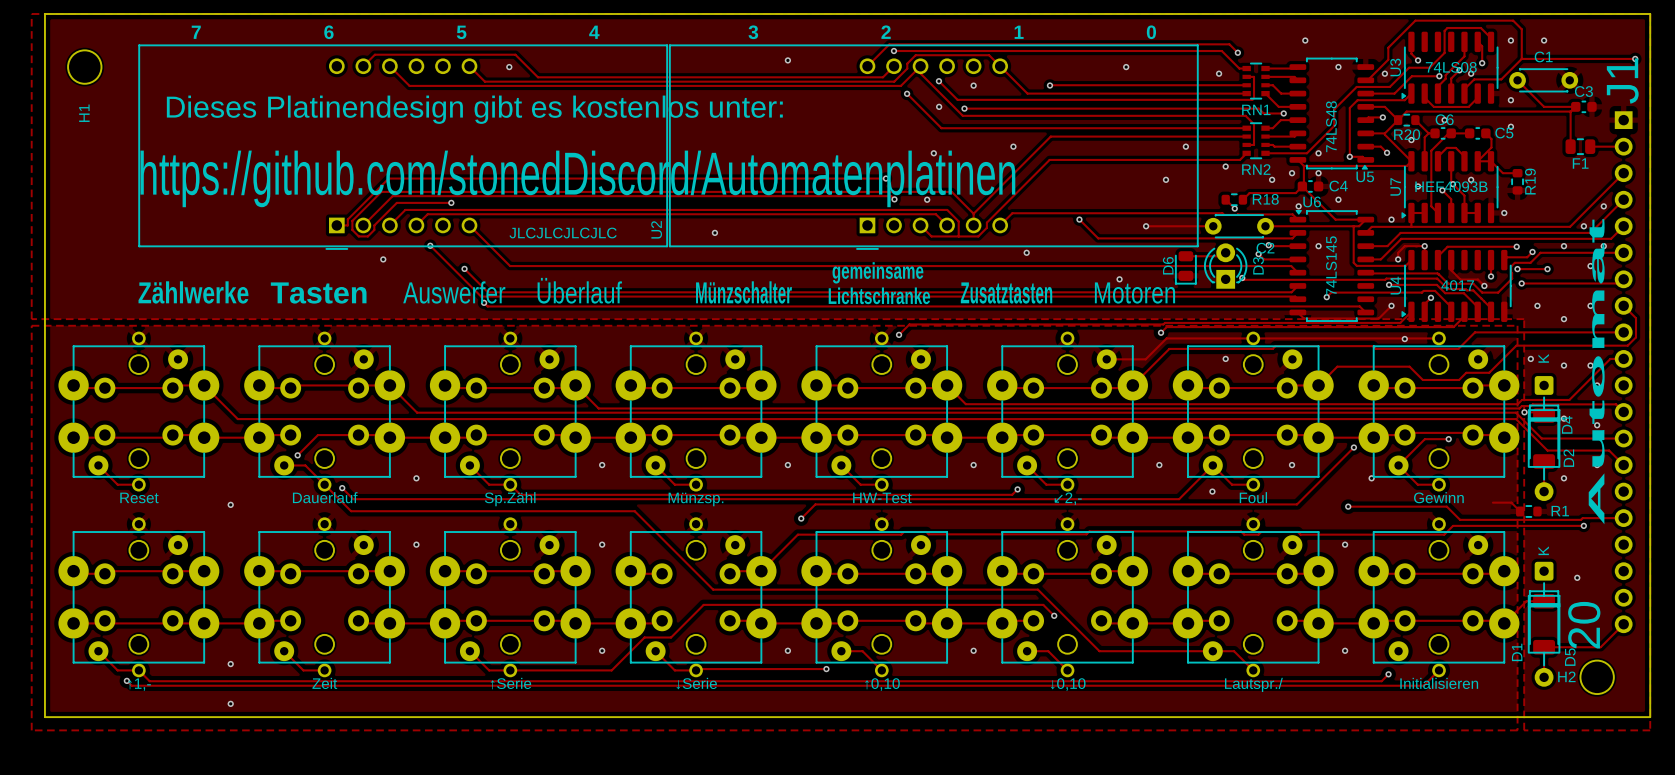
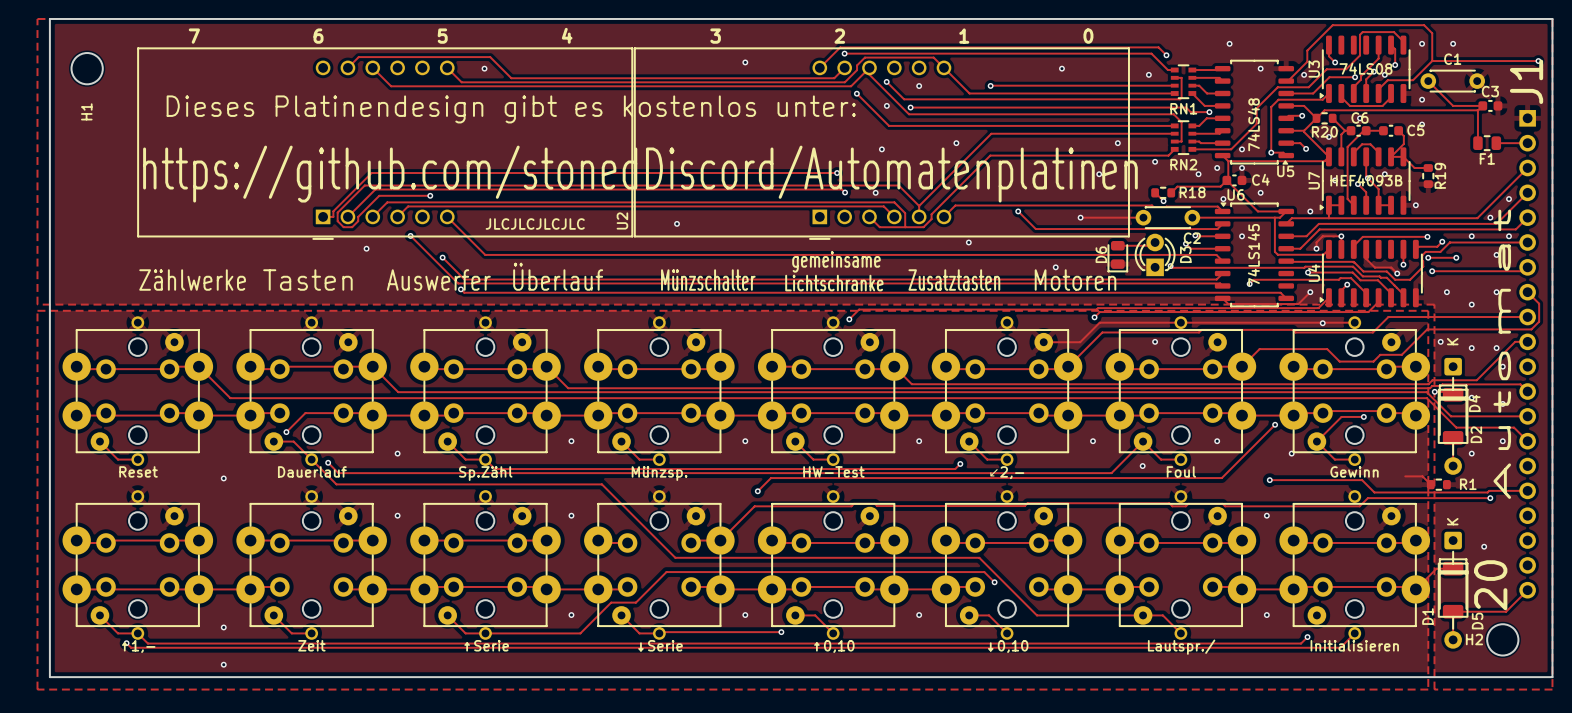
U4 value: 4017 (1457, 285) -> none

